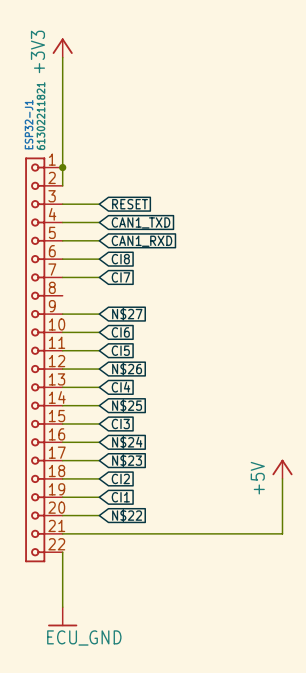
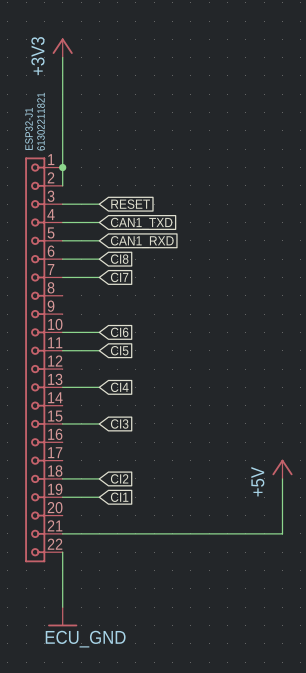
wire: (62, 314) (99, 314) -> none
global label: N$27 (127, 314) -> none
wire: (62, 369) (99, 369) -> none
global label: N$26 (127, 369) -> none
wire: (62, 405) (99, 405) -> none
global label: N$25 (127, 405) -> none
wire: (62, 442) (99, 442) -> none
global label: N$24 (127, 442) -> none
wire: (62, 460) (99, 460) -> none
global label: N$23 (127, 460) -> none
wire: (62, 515) (99, 515) -> none
global label: N$22 (127, 515) -> none

